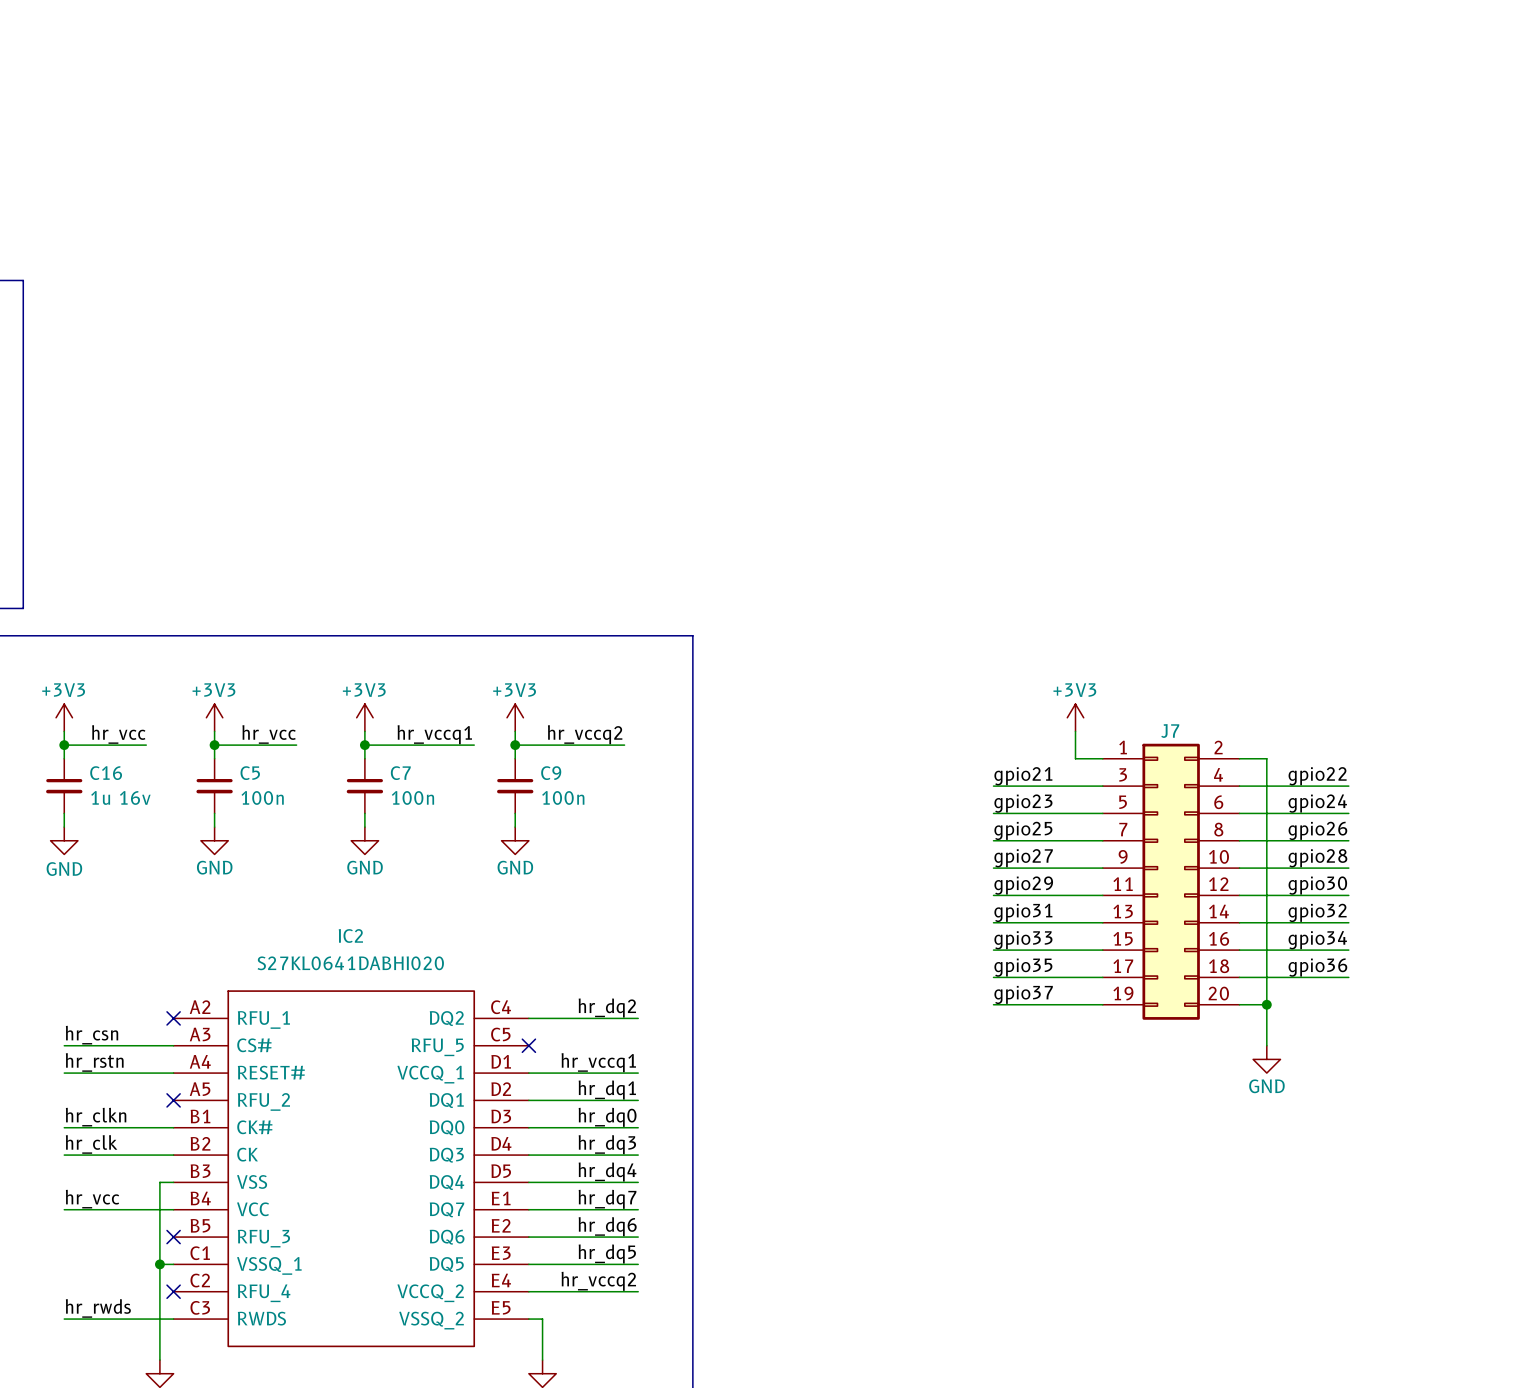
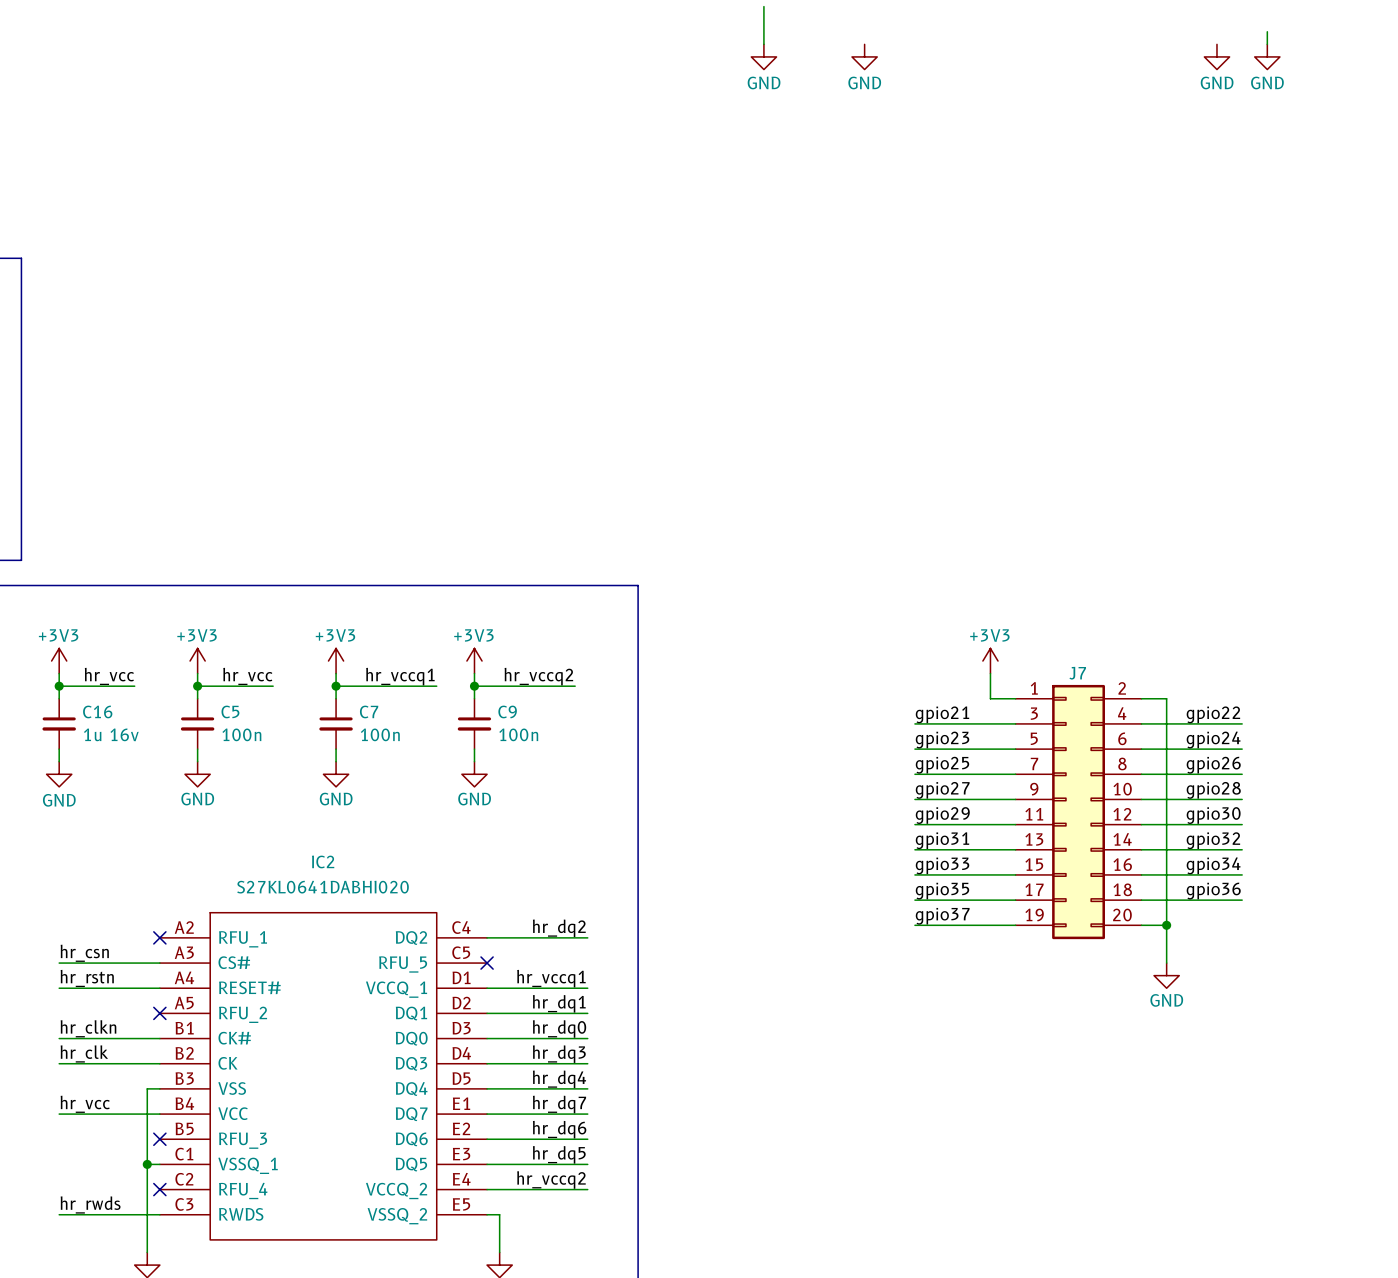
wire: none -> (763, 6) (763, 44)
wire: none -> (1267, 31) (1267, 44)
power symbol: none -> GND (763, 56)
power symbol: none -> GND (864, 56)
power symbol: none -> GND (1216, 56)
power symbol: none -> GND (1267, 56)

